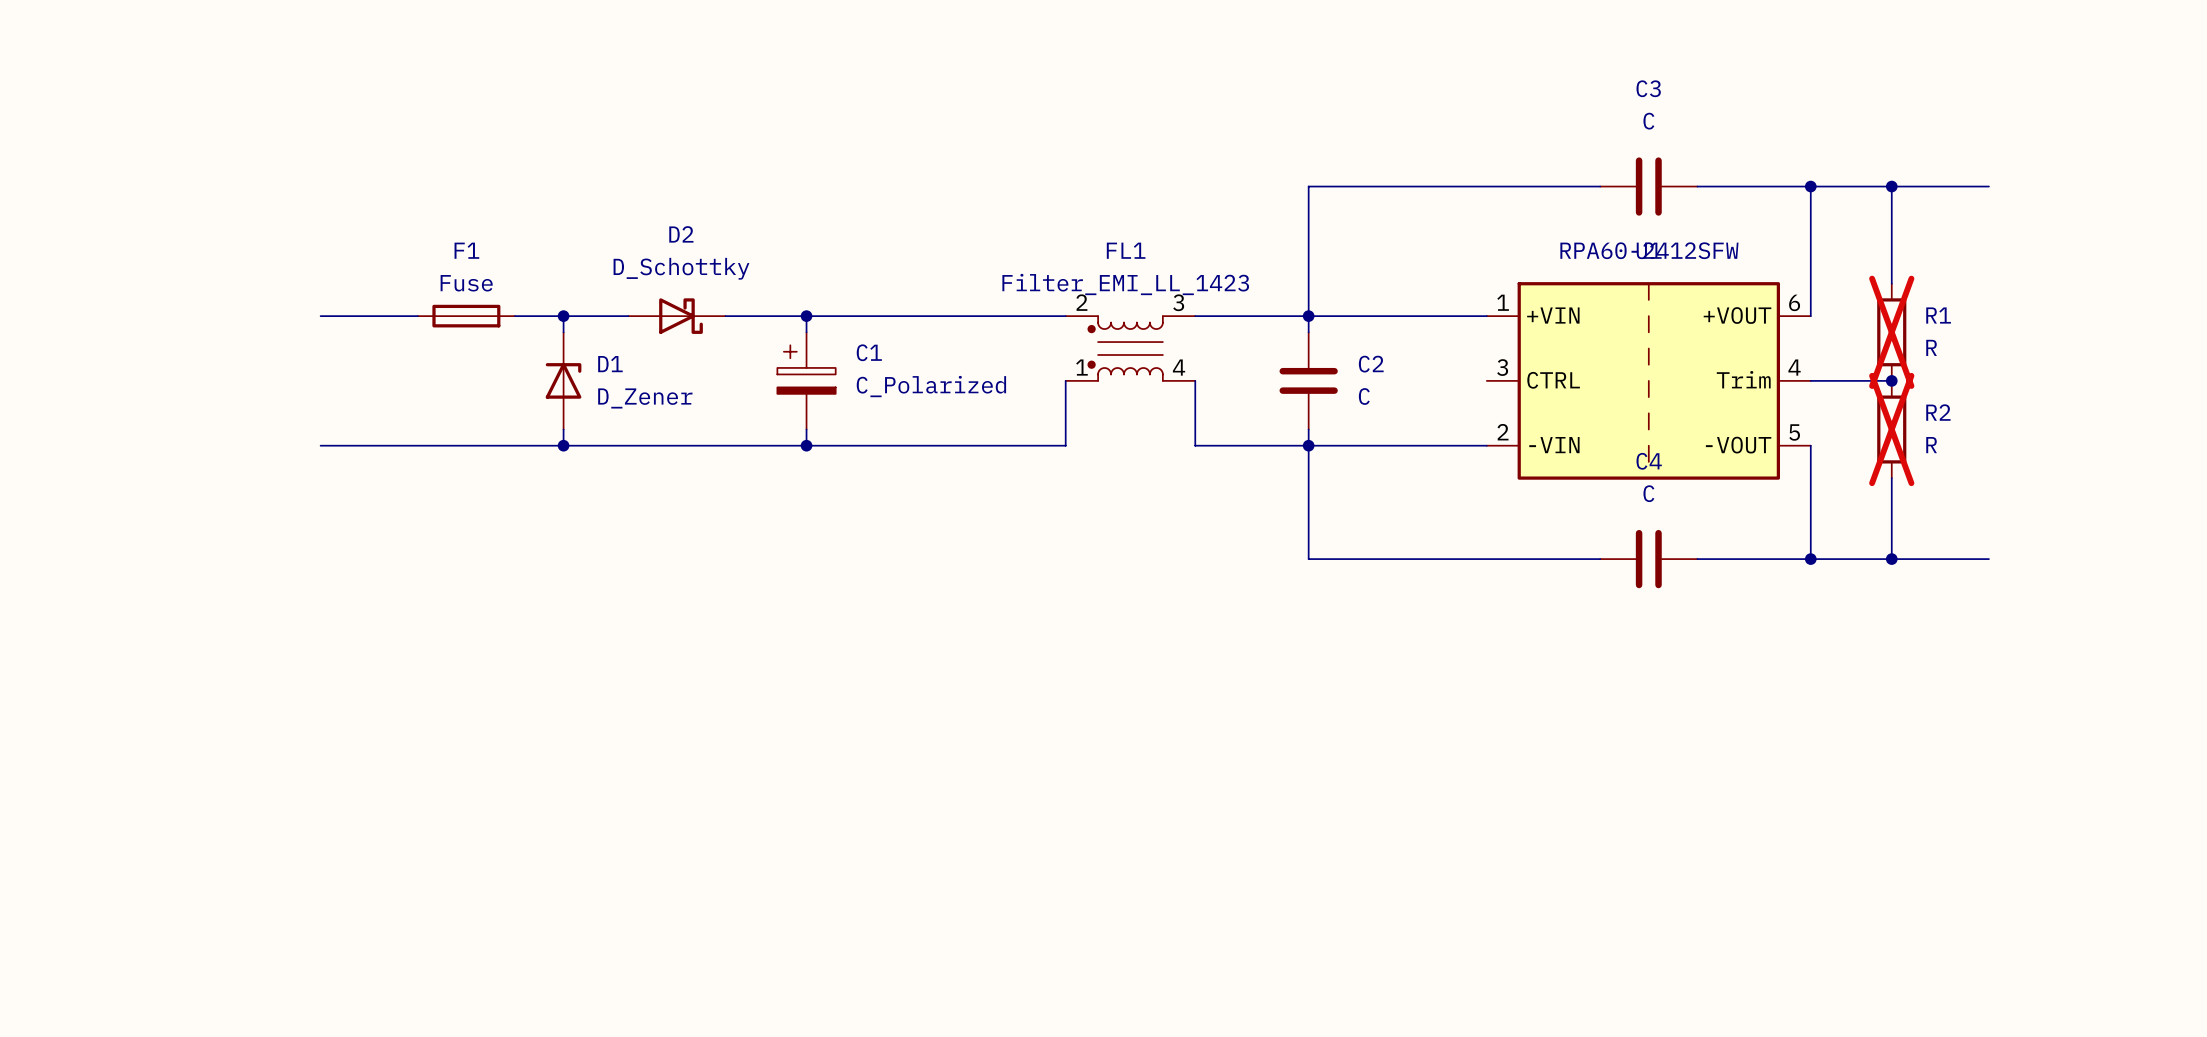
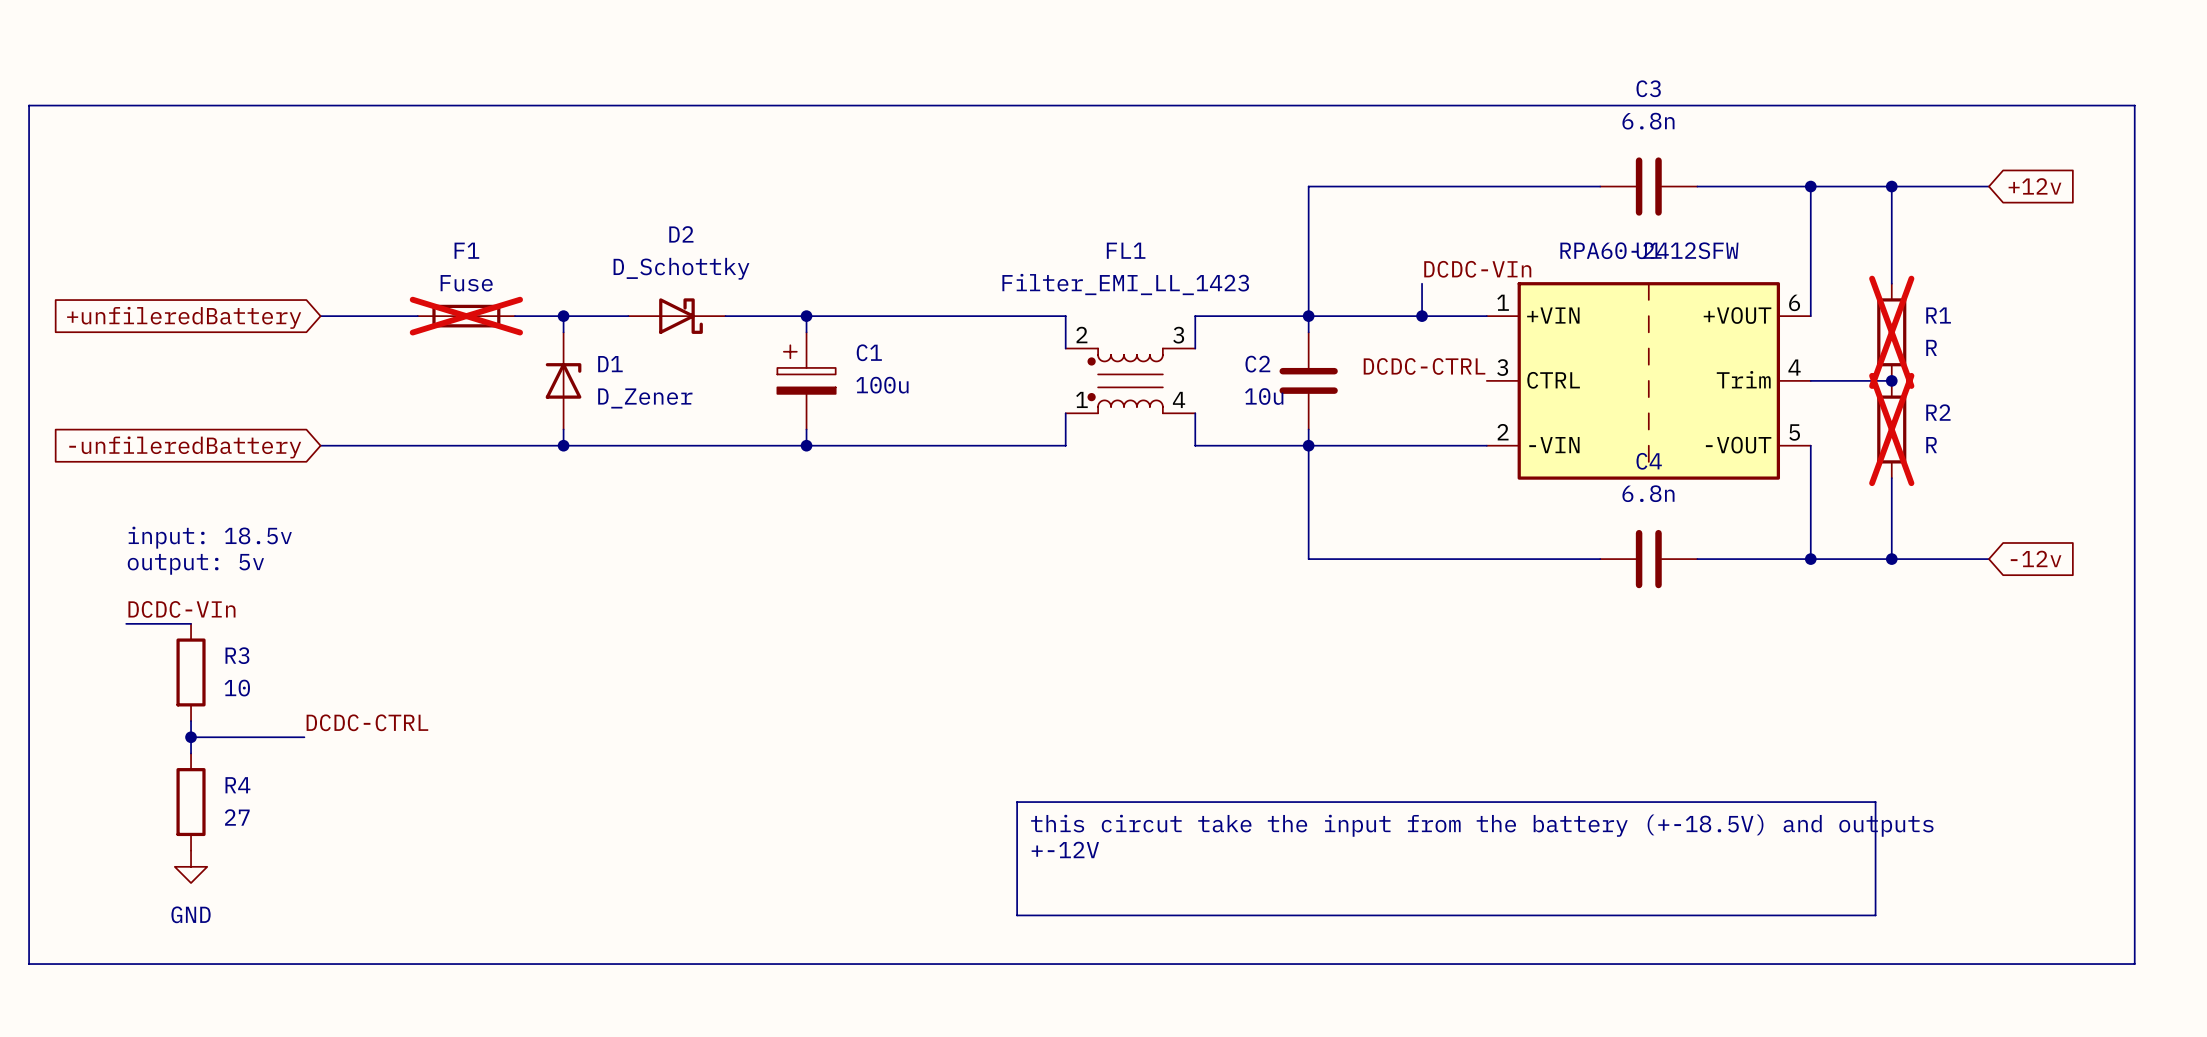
line: none -> (29, 105) (2134, 105) (2134, 964) (29, 964) (29, 105)
C3 value: C (1648, 121) -> 6.8n (1648, 121)
global label: none -> +12v (2034, 186)
label: none -> DCDC-VIn (1477, 269)
wire: none -> (1422, 283) (1422, 316)
F1 do-not-place cross: none -> (466, 316)
junction: none -> (1422, 316)
global label: none -> +unfileredBattery (184, 317)
FL1 position: (1130, 348) -> (1130, 380)
C2 name position: C2 (1371, 364) -> C2 (1257, 364)
label: none -> DCDC-CTRL (1424, 366)
wire: (1065, 380) (1065, 413) -> (1065, 316) (1065, 348)
wire: (1195, 380) (1195, 413) -> (1195, 316) (1195, 348)
C1 value: C_Polarized (931, 386) -> 100u (882, 385)
C2 value: C (1364, 396) -> 10u (1264, 396)
global label: none -> -unfileredBattery (185, 447)
C4 value: C (1648, 493) -> 6.8n (1648, 493)
text: none -> input: 18.5v (210, 537)
global label: none -> -12v (2036, 558)
text: none -> output: 5v (195, 564)
label: none -> DCDC-VIn (181, 609)
wire: none -> (126, 623) (191, 623)
R3: none -> 10 (191, 672)
wire: none -> (191, 721) (191, 753)
label: none -> DCDC-CTRL (367, 722)
wire: none -> (191, 737) (304, 737)
junction: none -> (191, 737)
R4: none -> 27 (191, 802)
line: none -> (1017, 802) (1875, 802) (1875, 915) (1017, 915) (1017, 802)
text: none -> this circut take the input from the battery (+-18.5V) and outputs (1482, 825)
text: none -> +-12V (1065, 849)
power symbol: none -> GND (191, 866)

